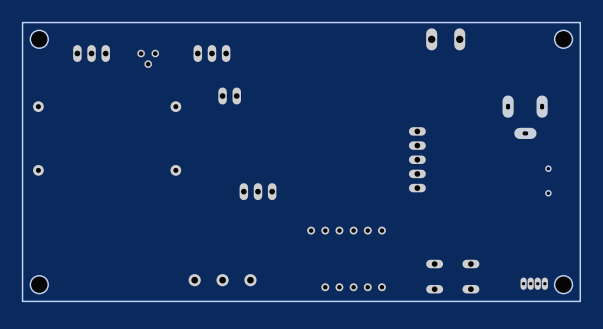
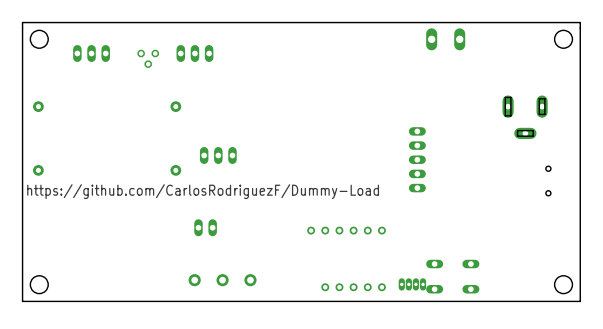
part position: (211, 53) -> (194, 53)
part position: (229, 96) -> (205, 227)
part: none -> (218, 155)
text: none -> https://github.com/CarlosRodriguezF/Dummy-Load (203, 191)
part: (257, 191) -> none
part position: (534, 283) -> (412, 284)

